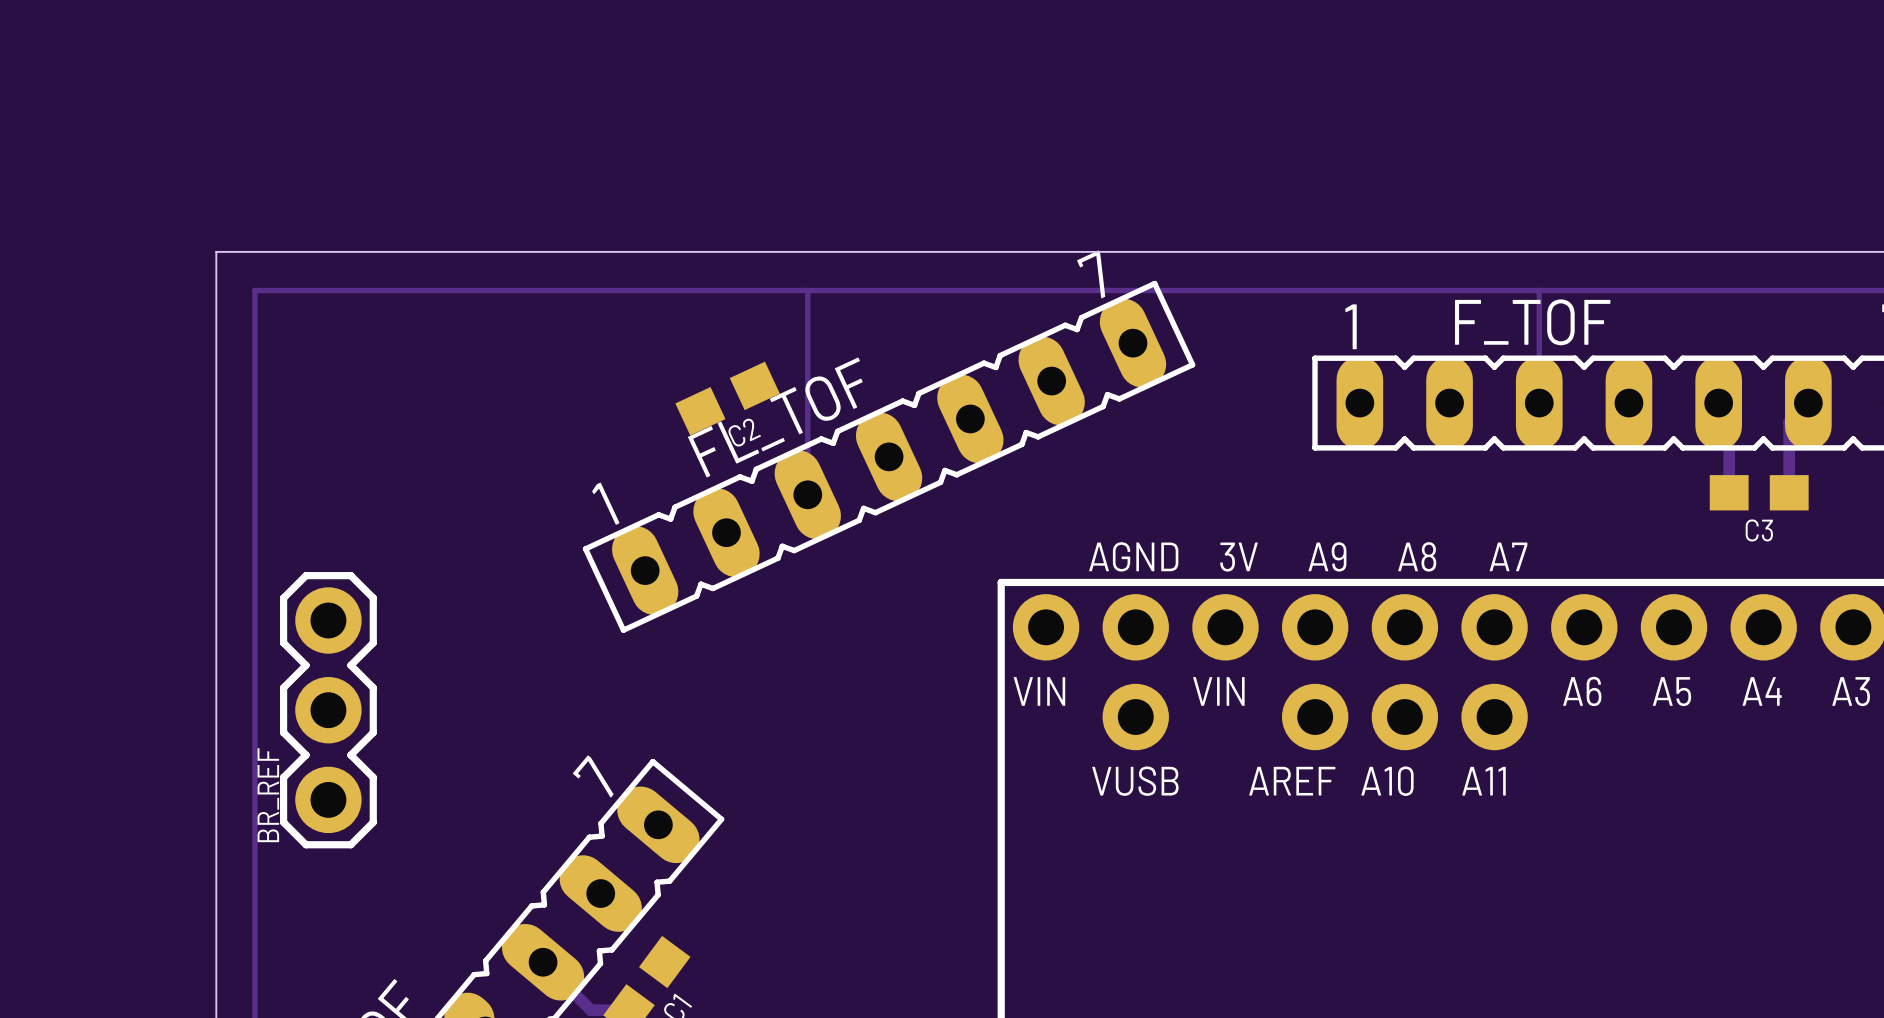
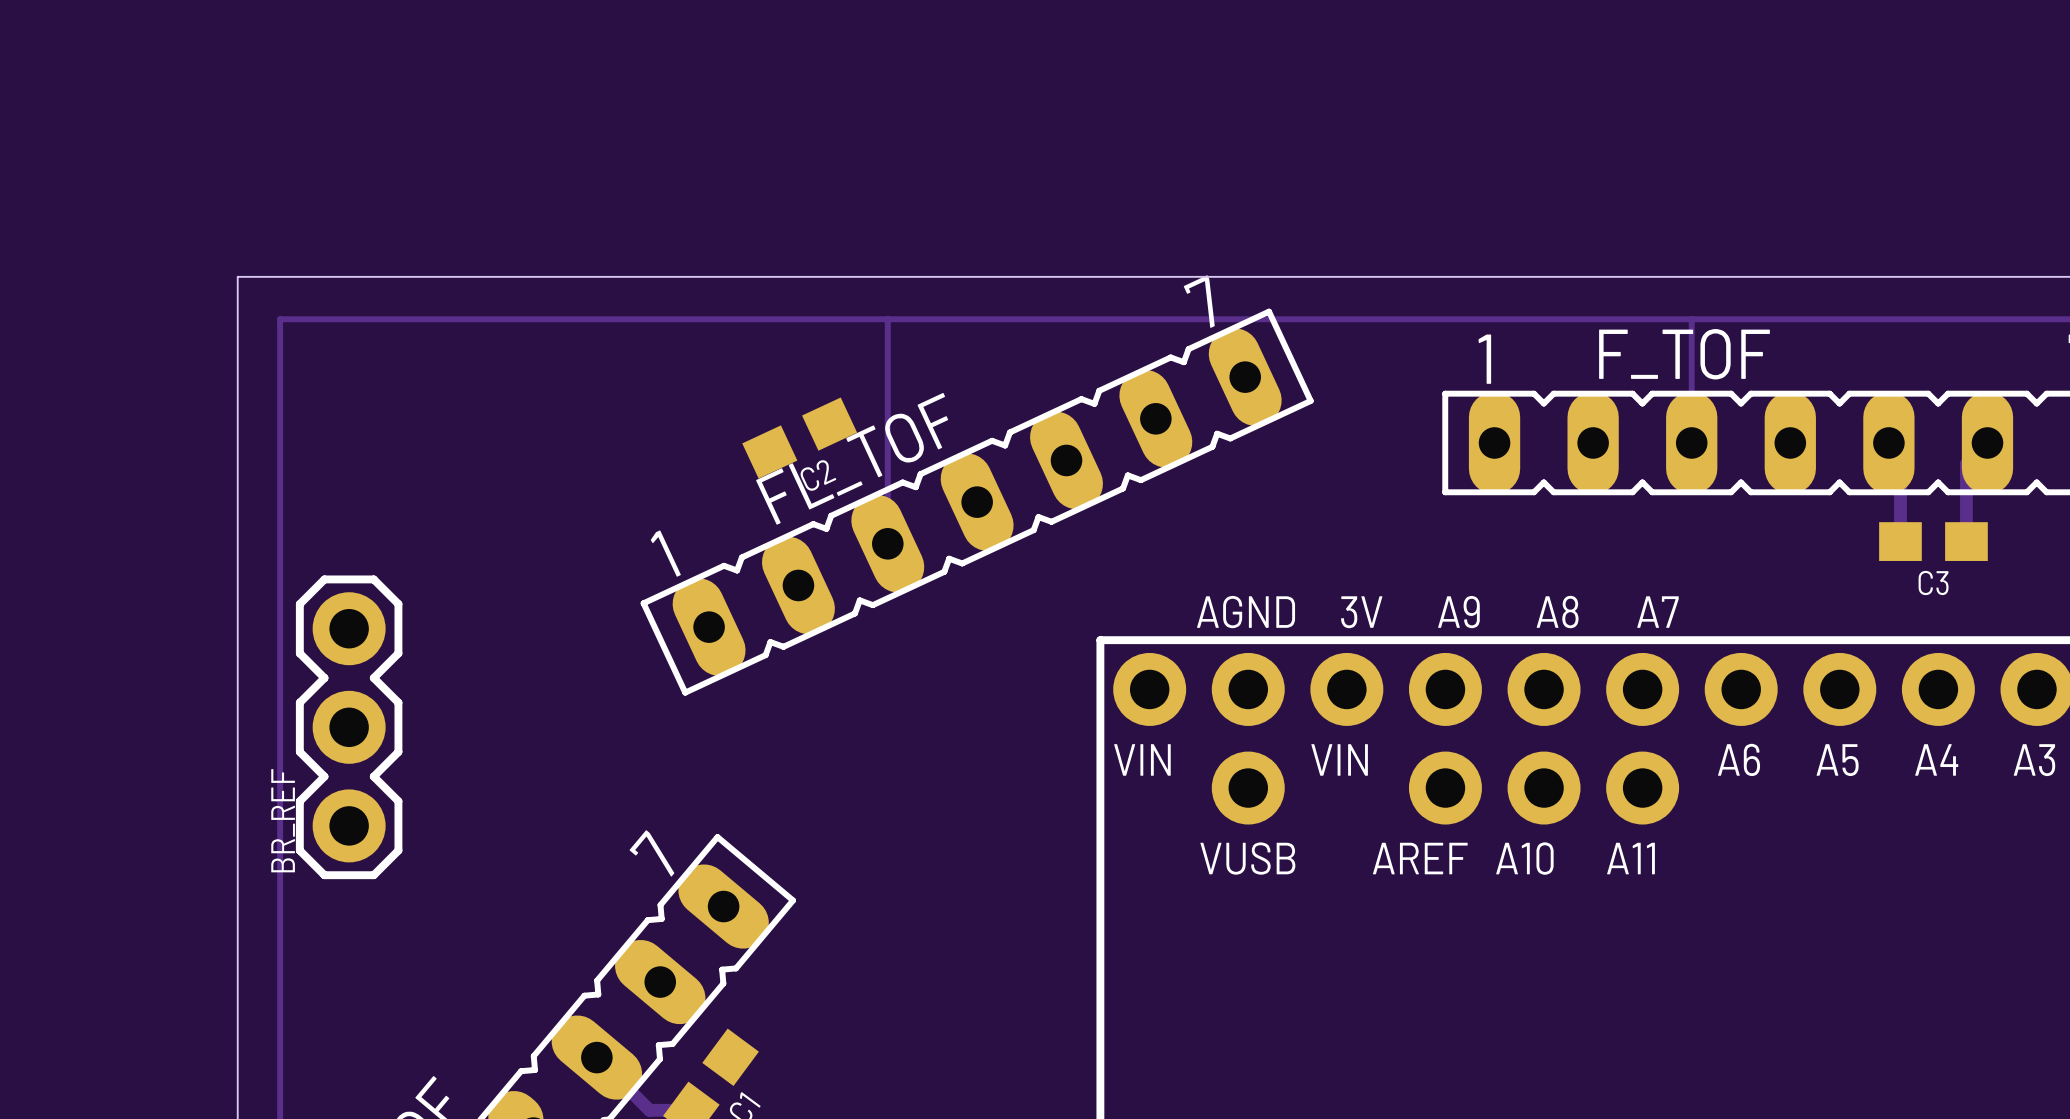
BR_REF position: (328, 710) -> (349, 727)

